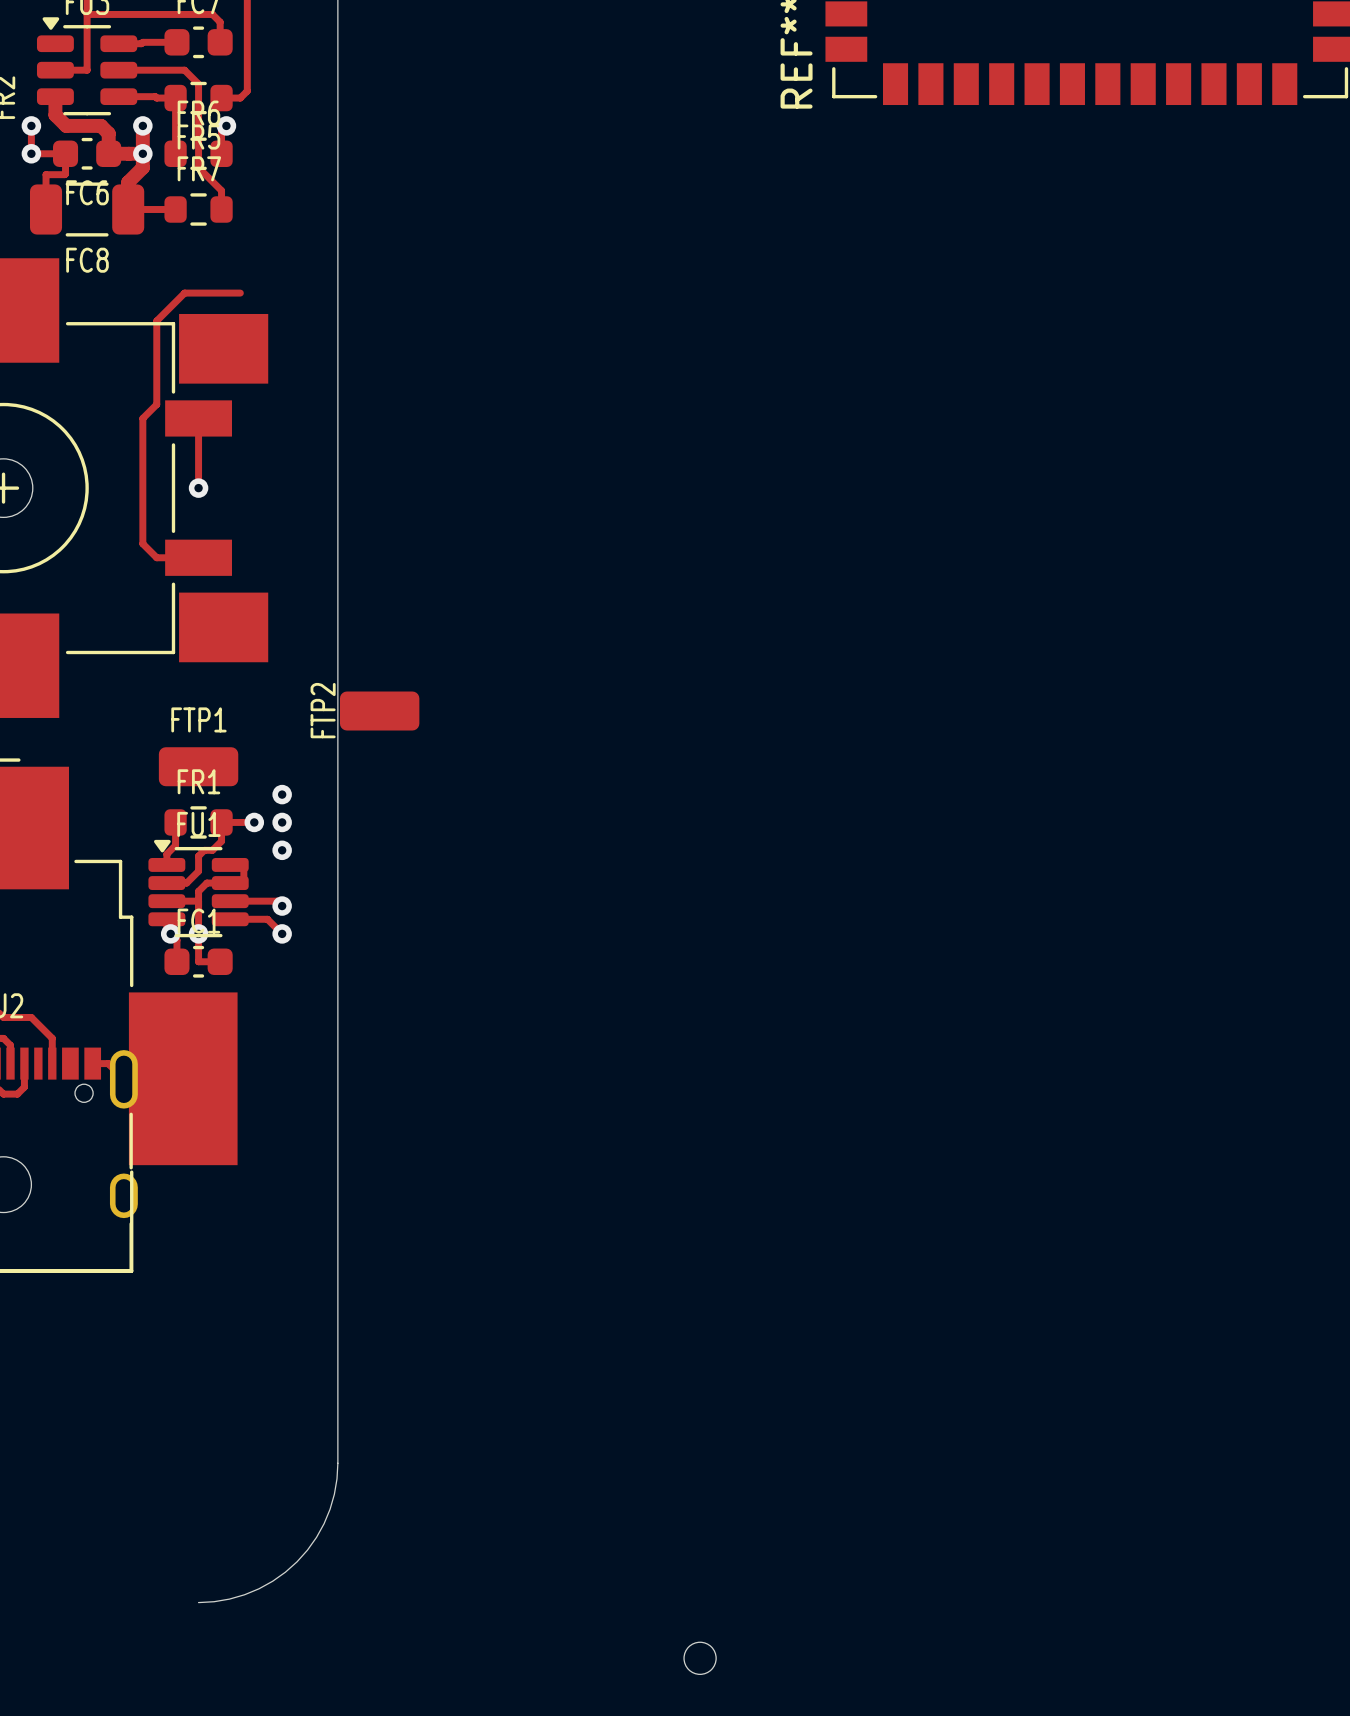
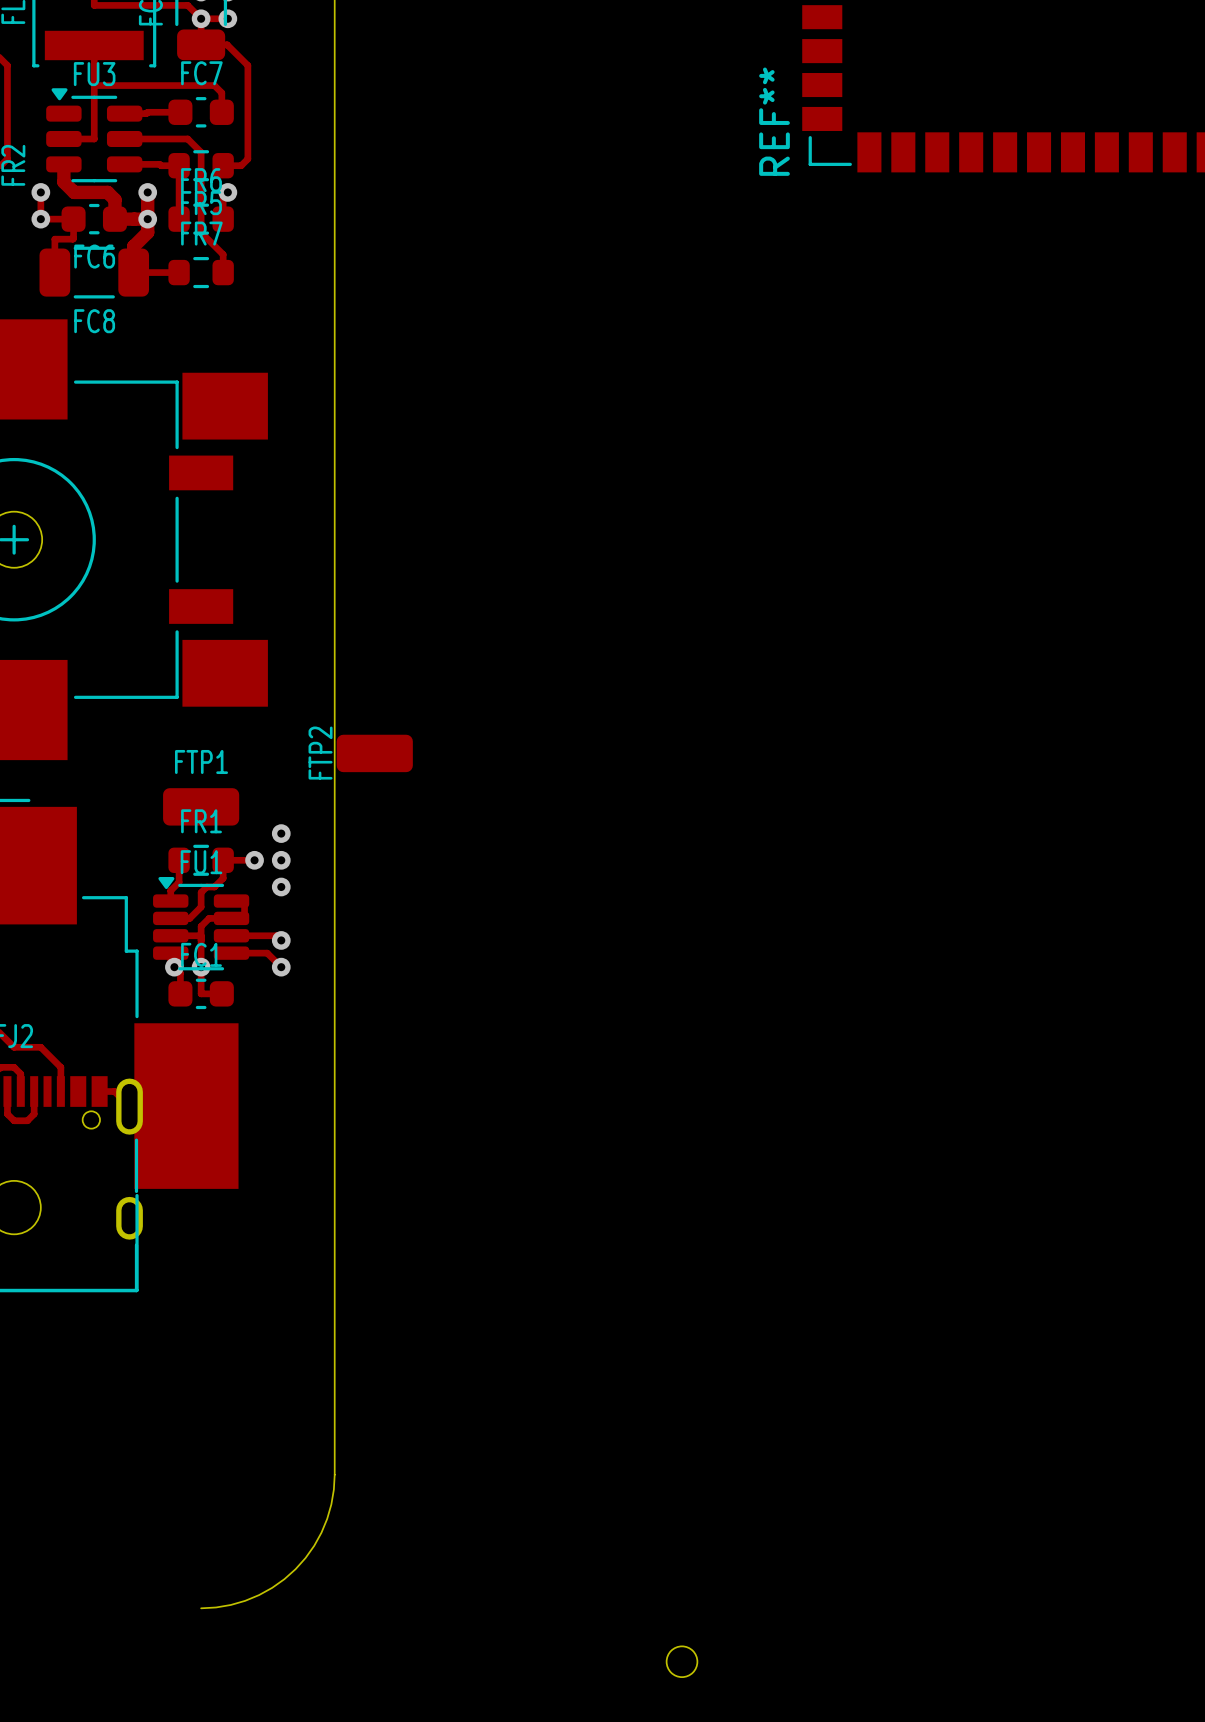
track: (240, 293) (184, 293) (156, 320) (156, 404) (142, 418) (142, 543) (156, 557) (198, 557) -> none
track: (198, 418) (198, 488) -> none
via: (198, 488) -> none

